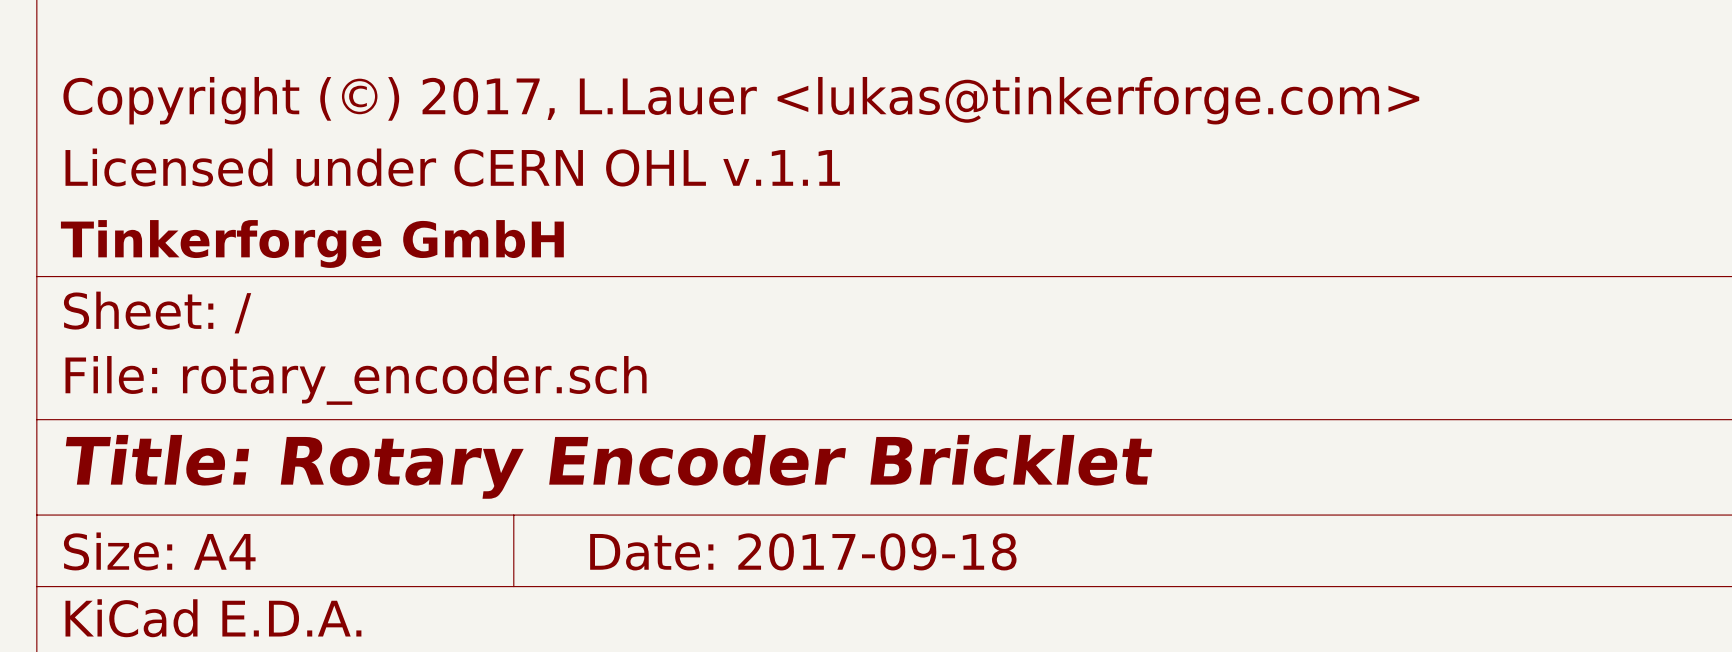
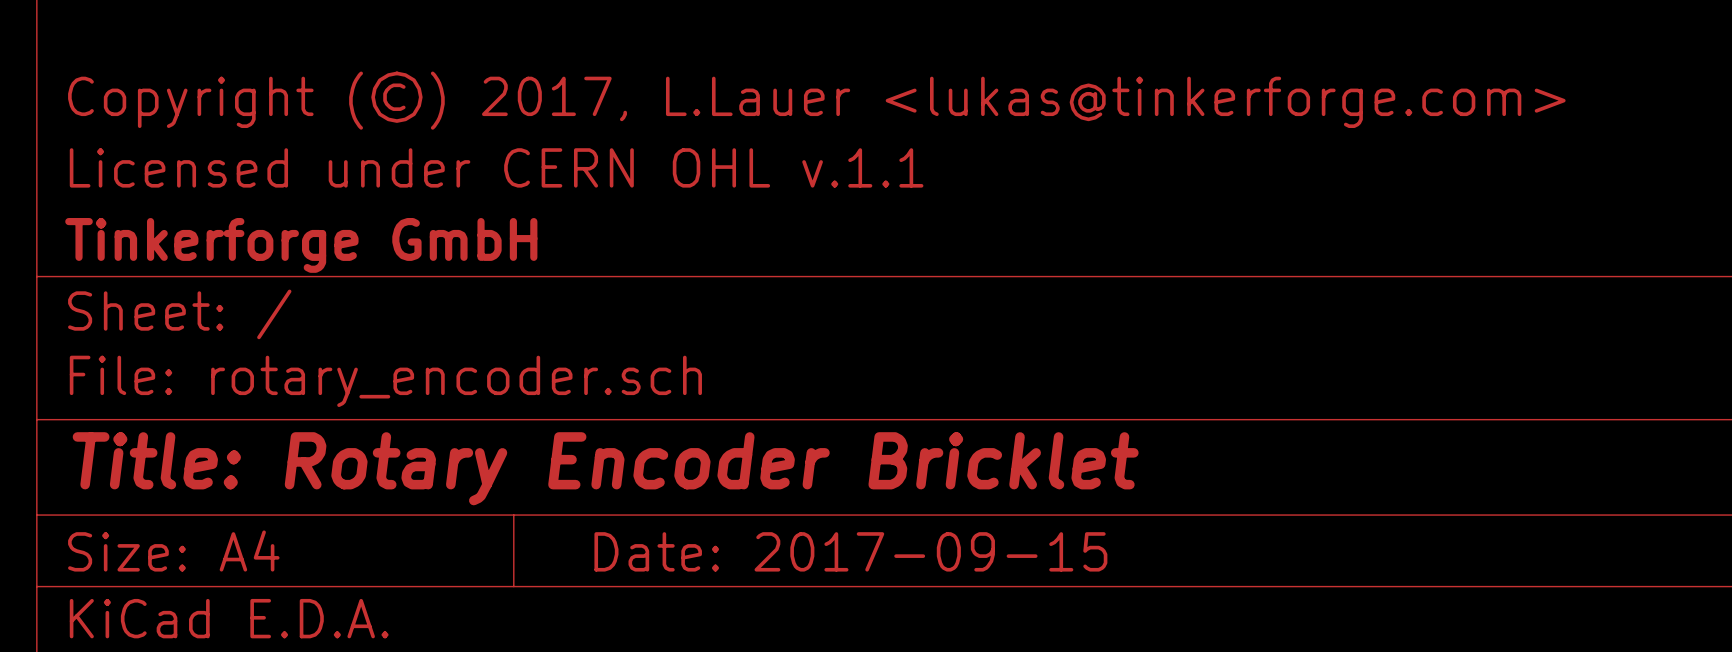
title block: Date: 2017-09-18 (803, 551) -> Date: 2017-09-15 (850, 551)

